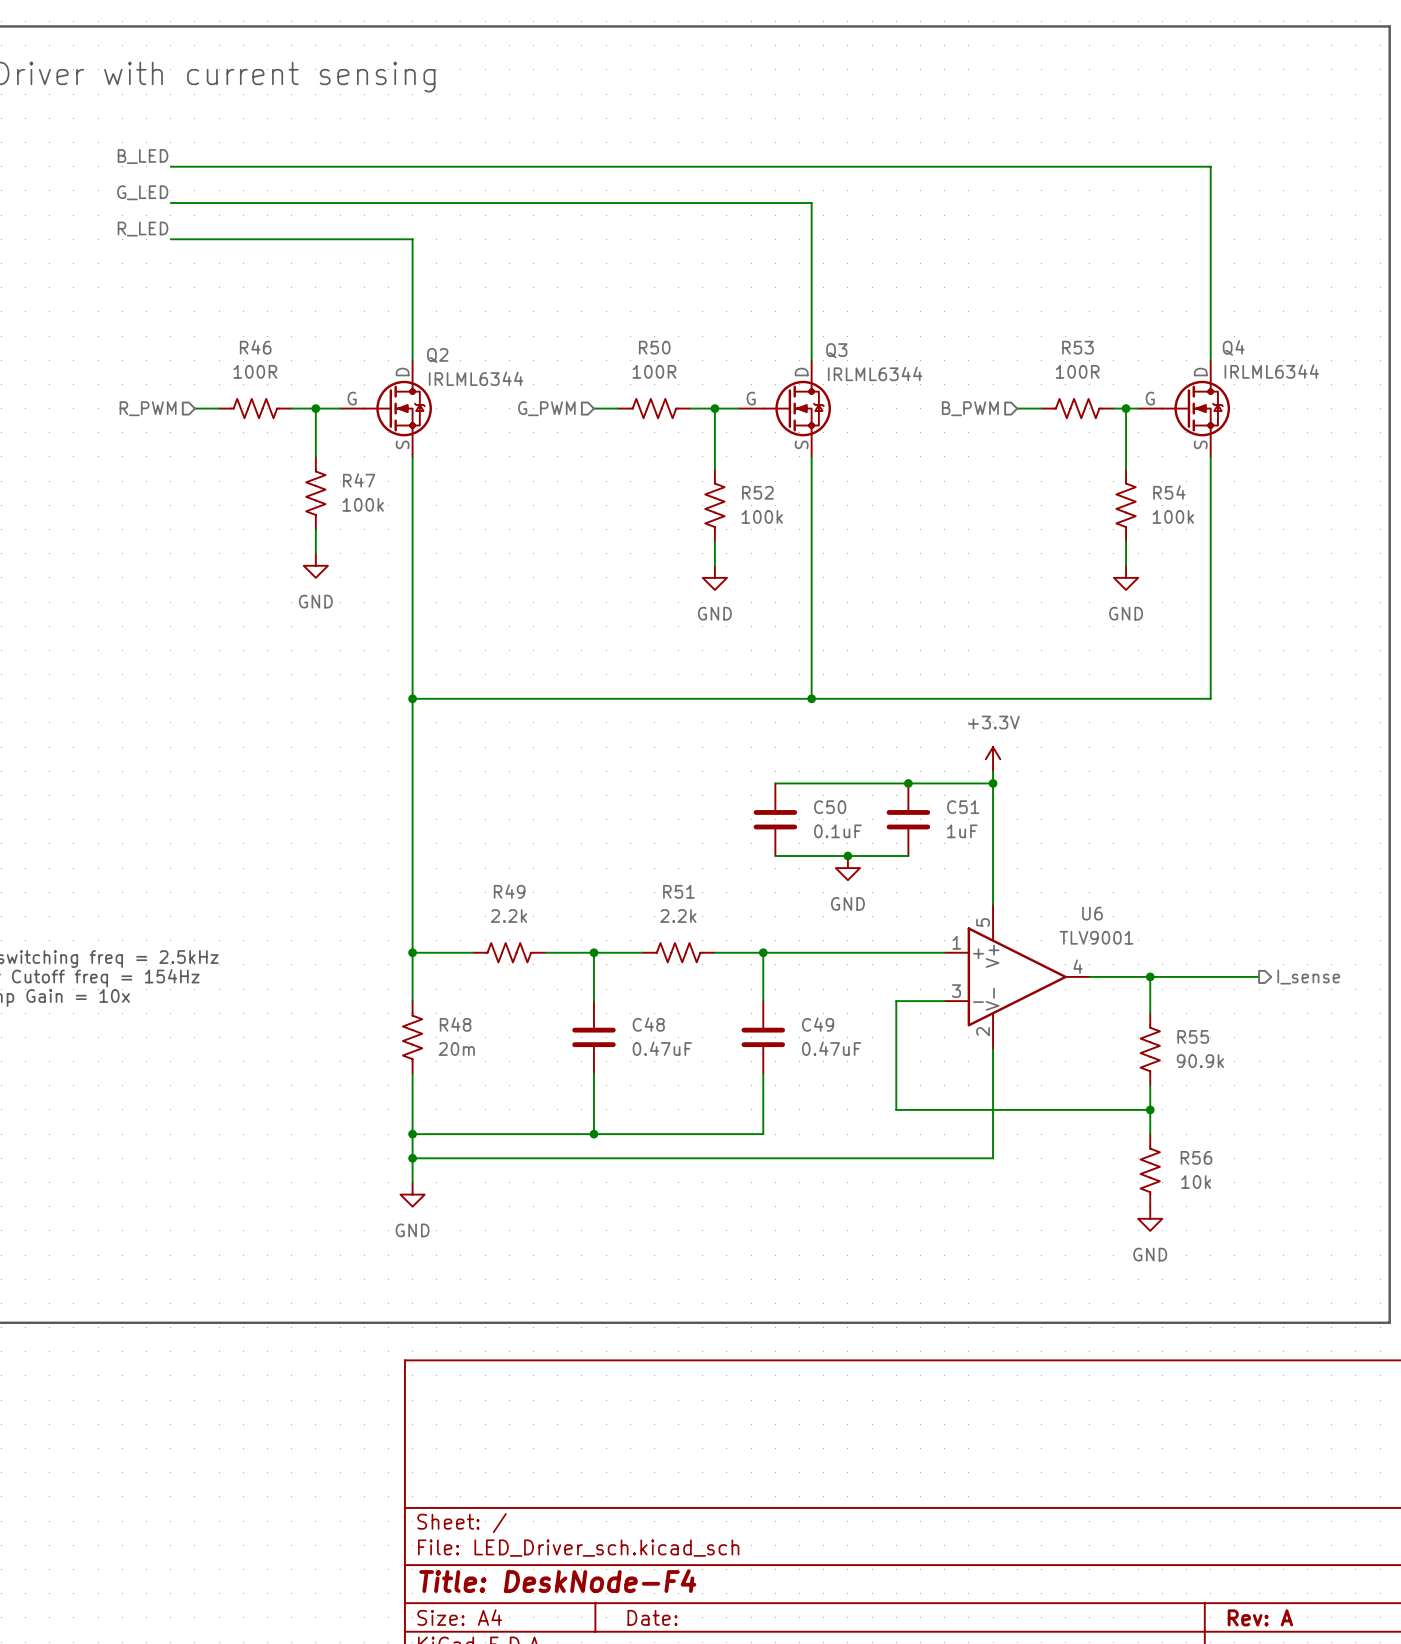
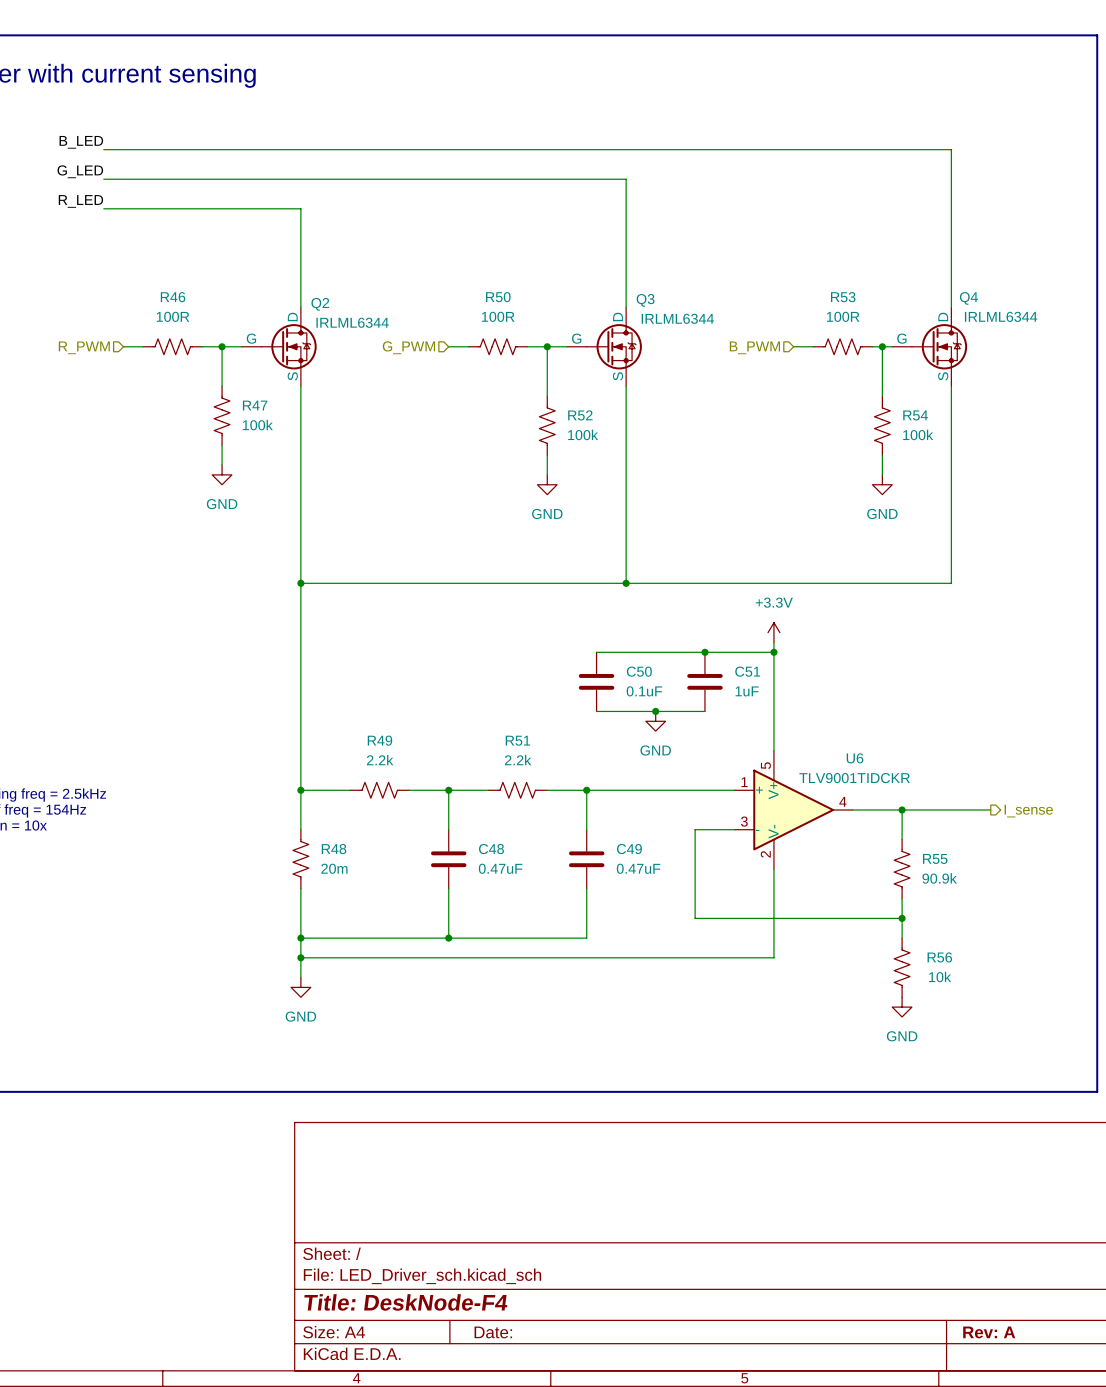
U6 value: none -> TLV9001TIDCKR (854, 778)
U6 text: TLV9001 (1096, 937) -> none

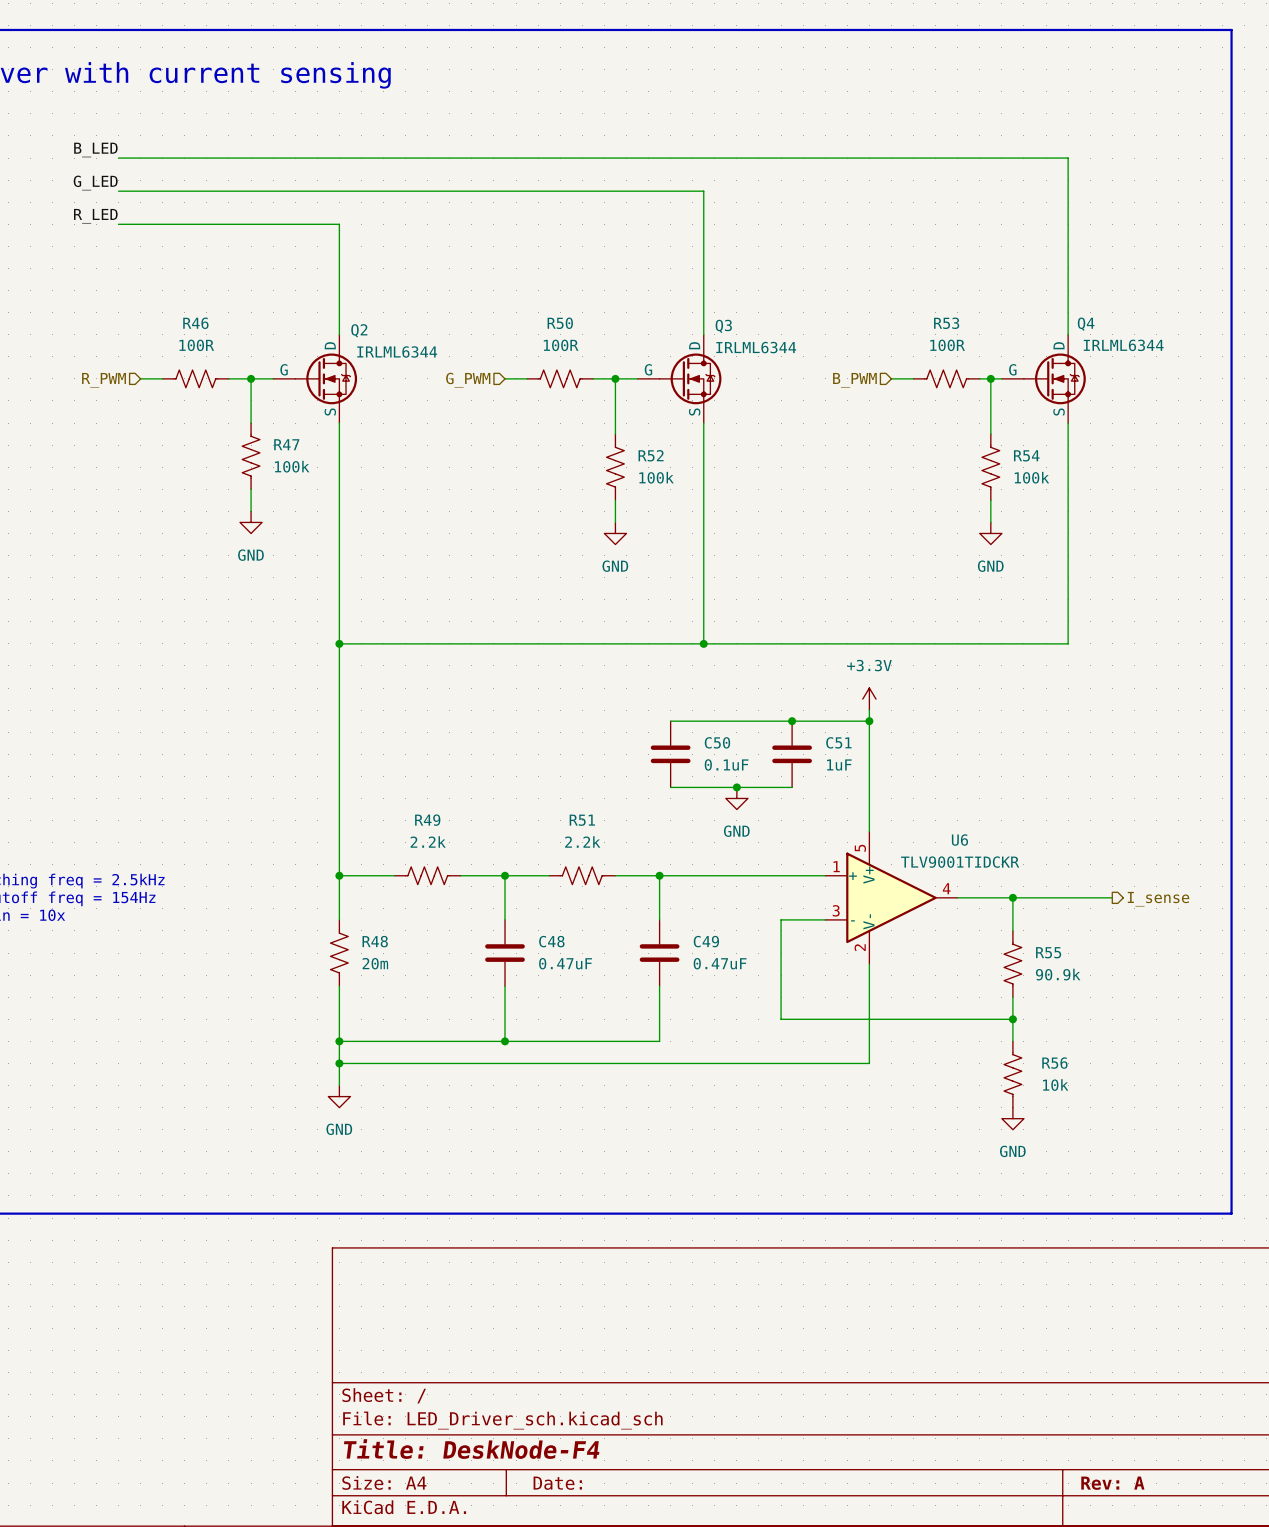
Q3 text: none -> IRLML6344 (756, 347)
Q3 text: IRLML6344 (677, 318) -> none

